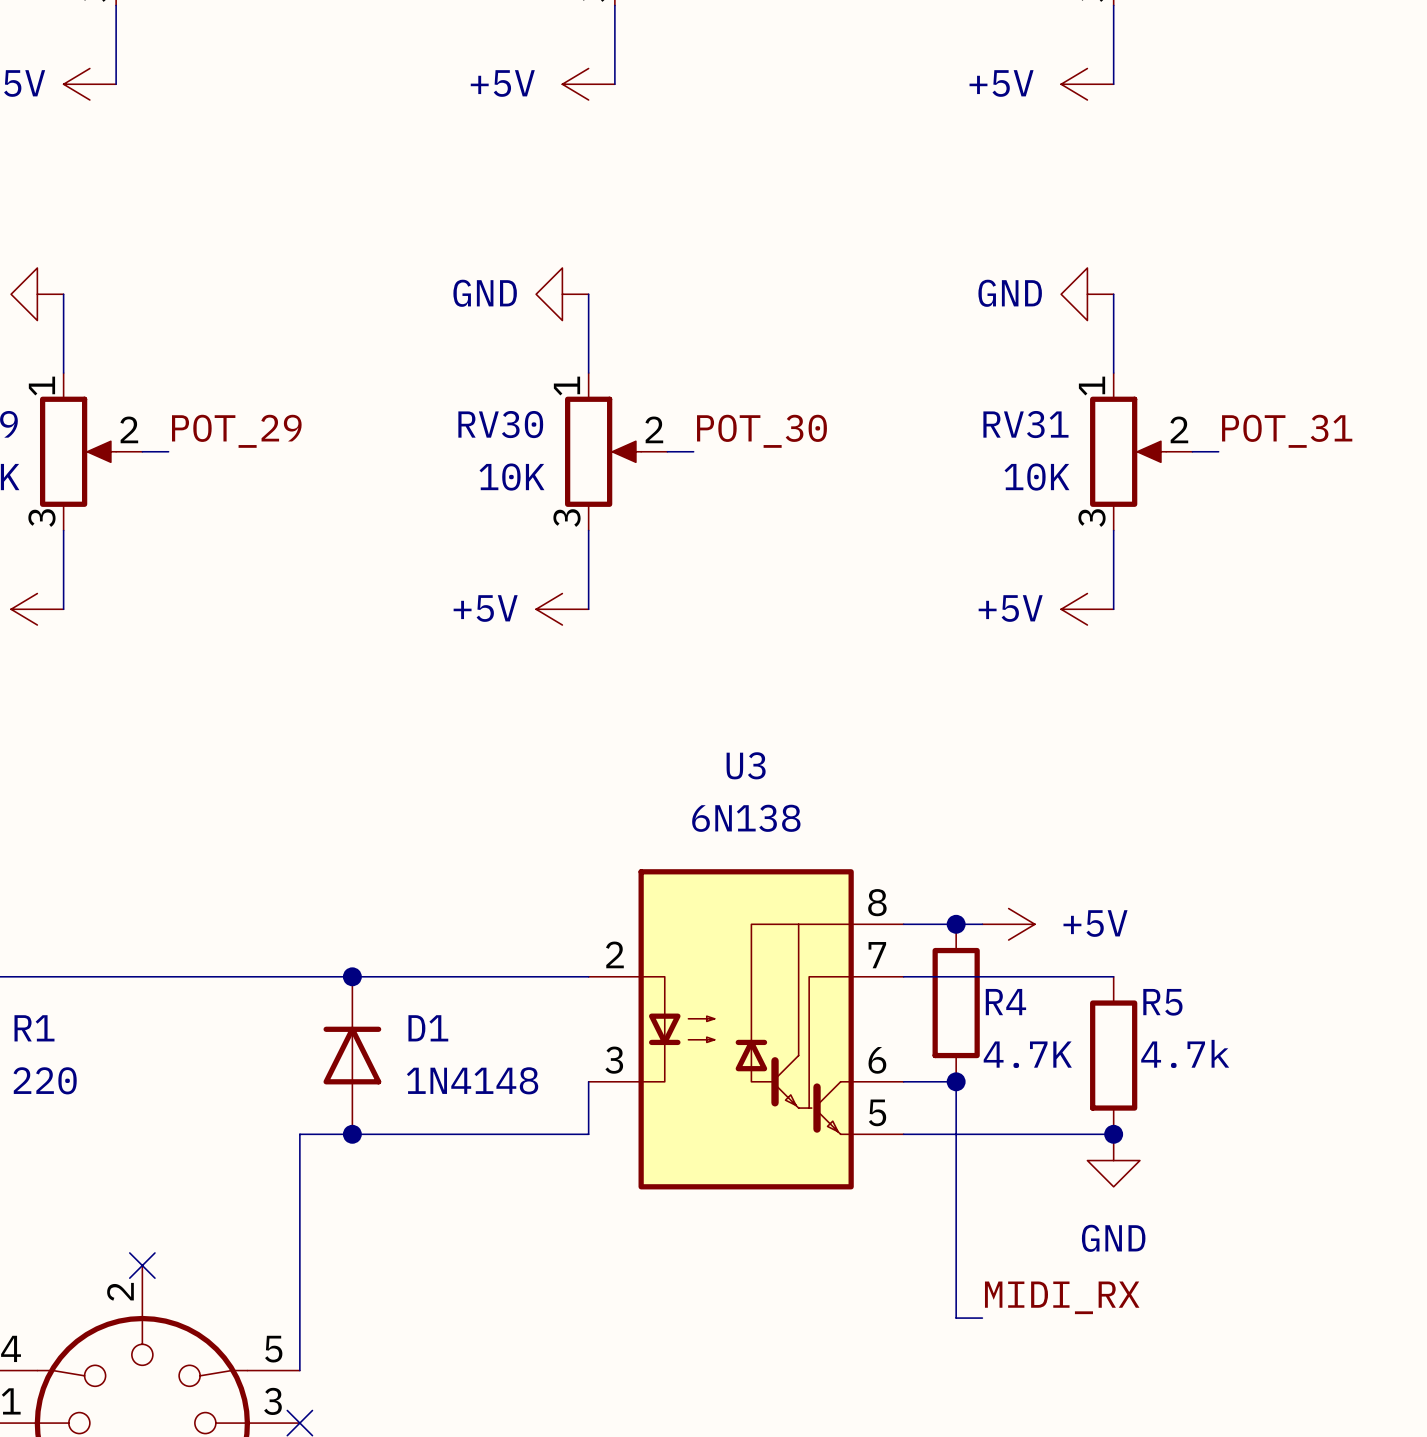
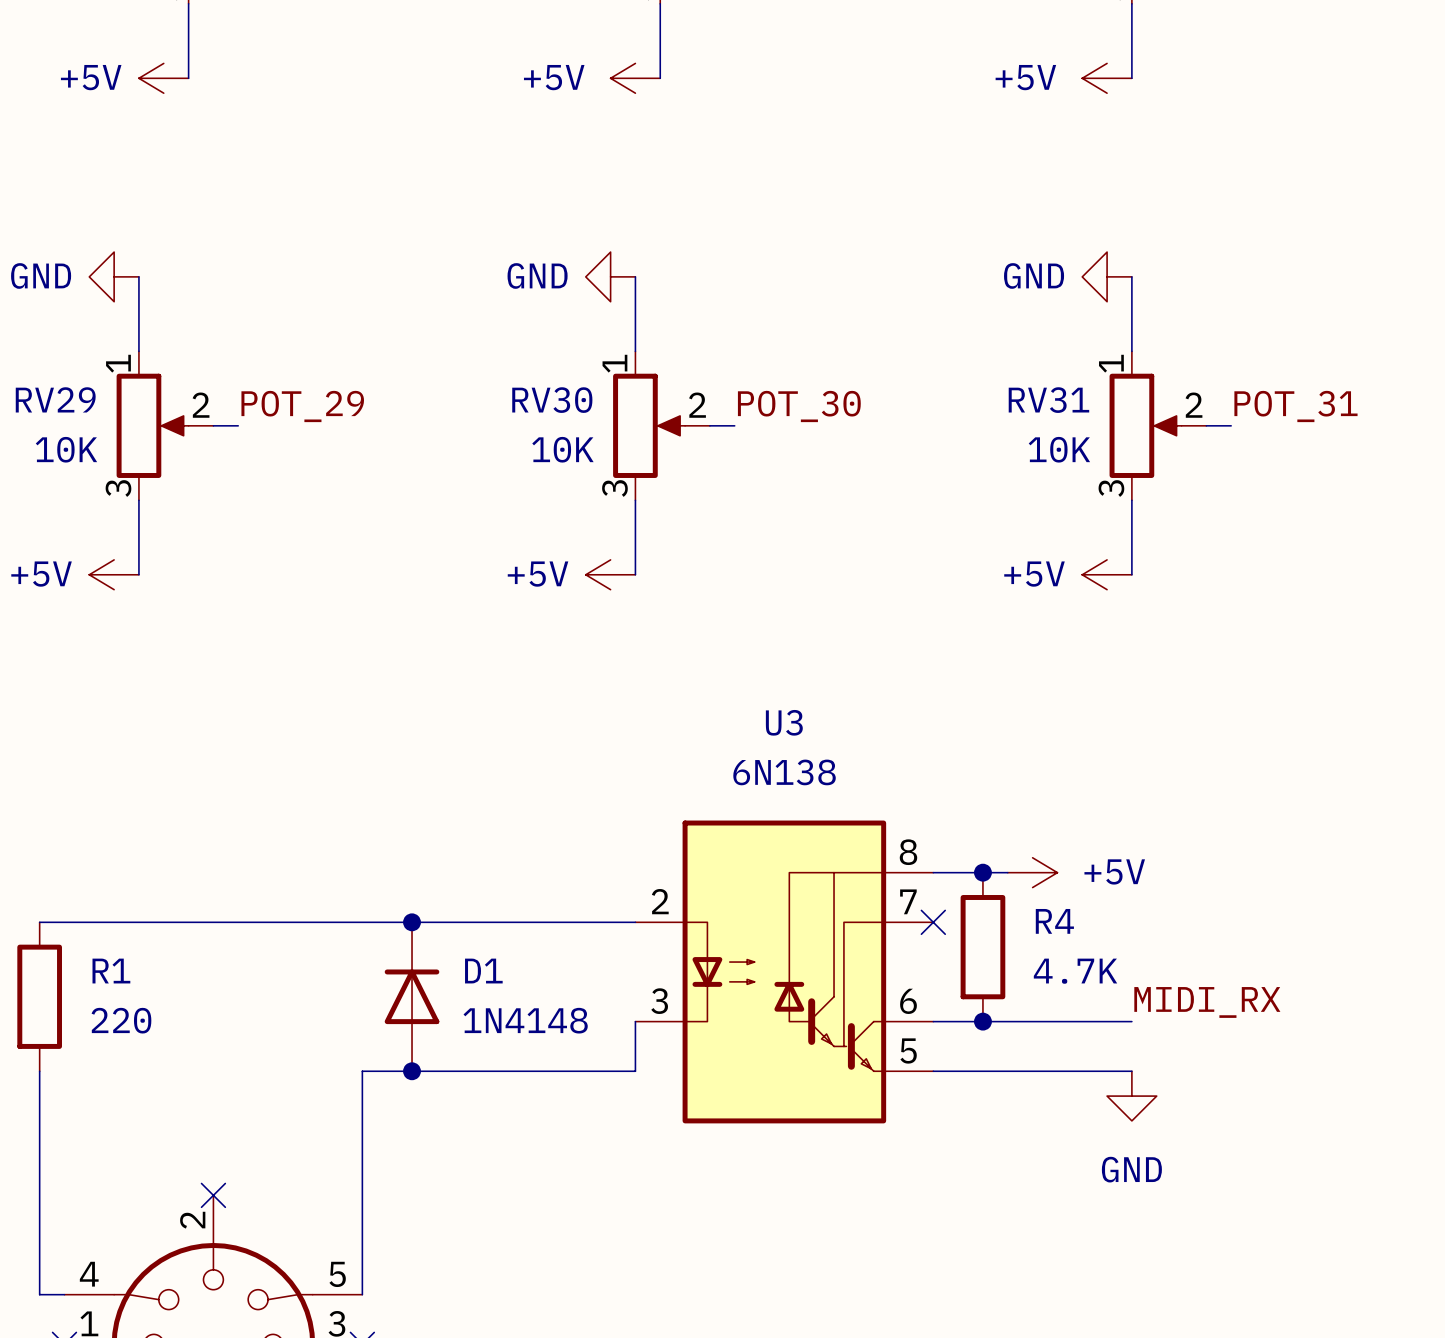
wire: (903, 976) (1113, 976) -> none
no-connect mark: none -> (933, 922)
R4 name position: R4 (1005, 1002) -> R4 (1054, 921)
R4 value position: 4.7K (1027, 1054) -> 4.7K (1075, 971)
R5: 4.7k (1113, 1055) -> none
wire: (956, 1081) (956, 1318) (982, 1318) -> (982, 1021) (1131, 1021)
junction: (1113, 1134) -> none
label position: MIDI_RX (1062, 1297) -> MIDI_RX (1207, 1002)

